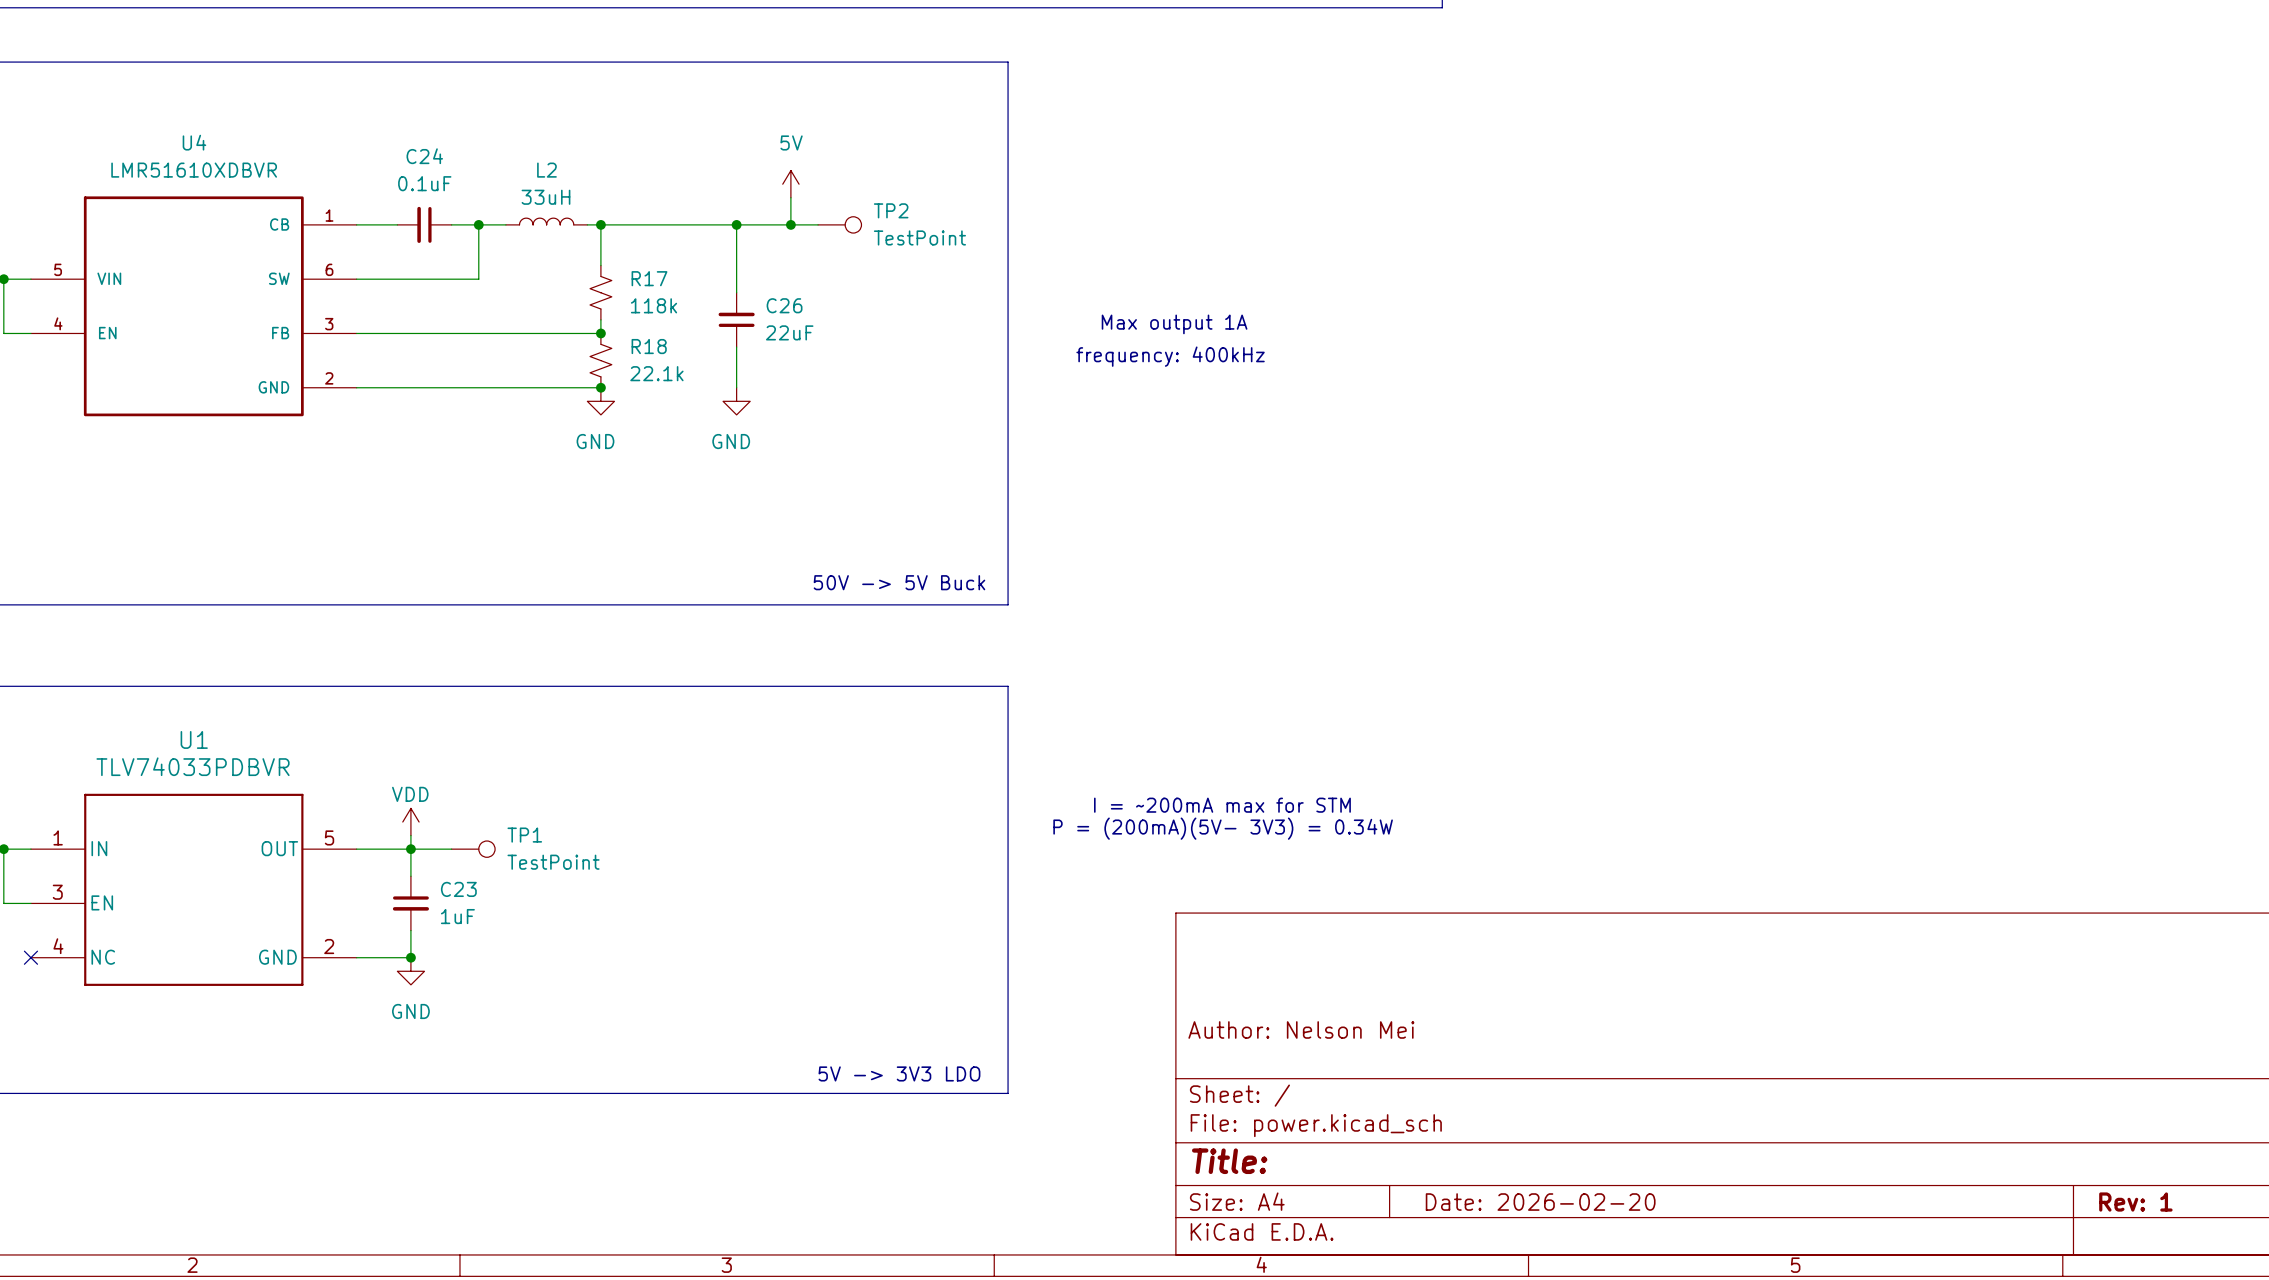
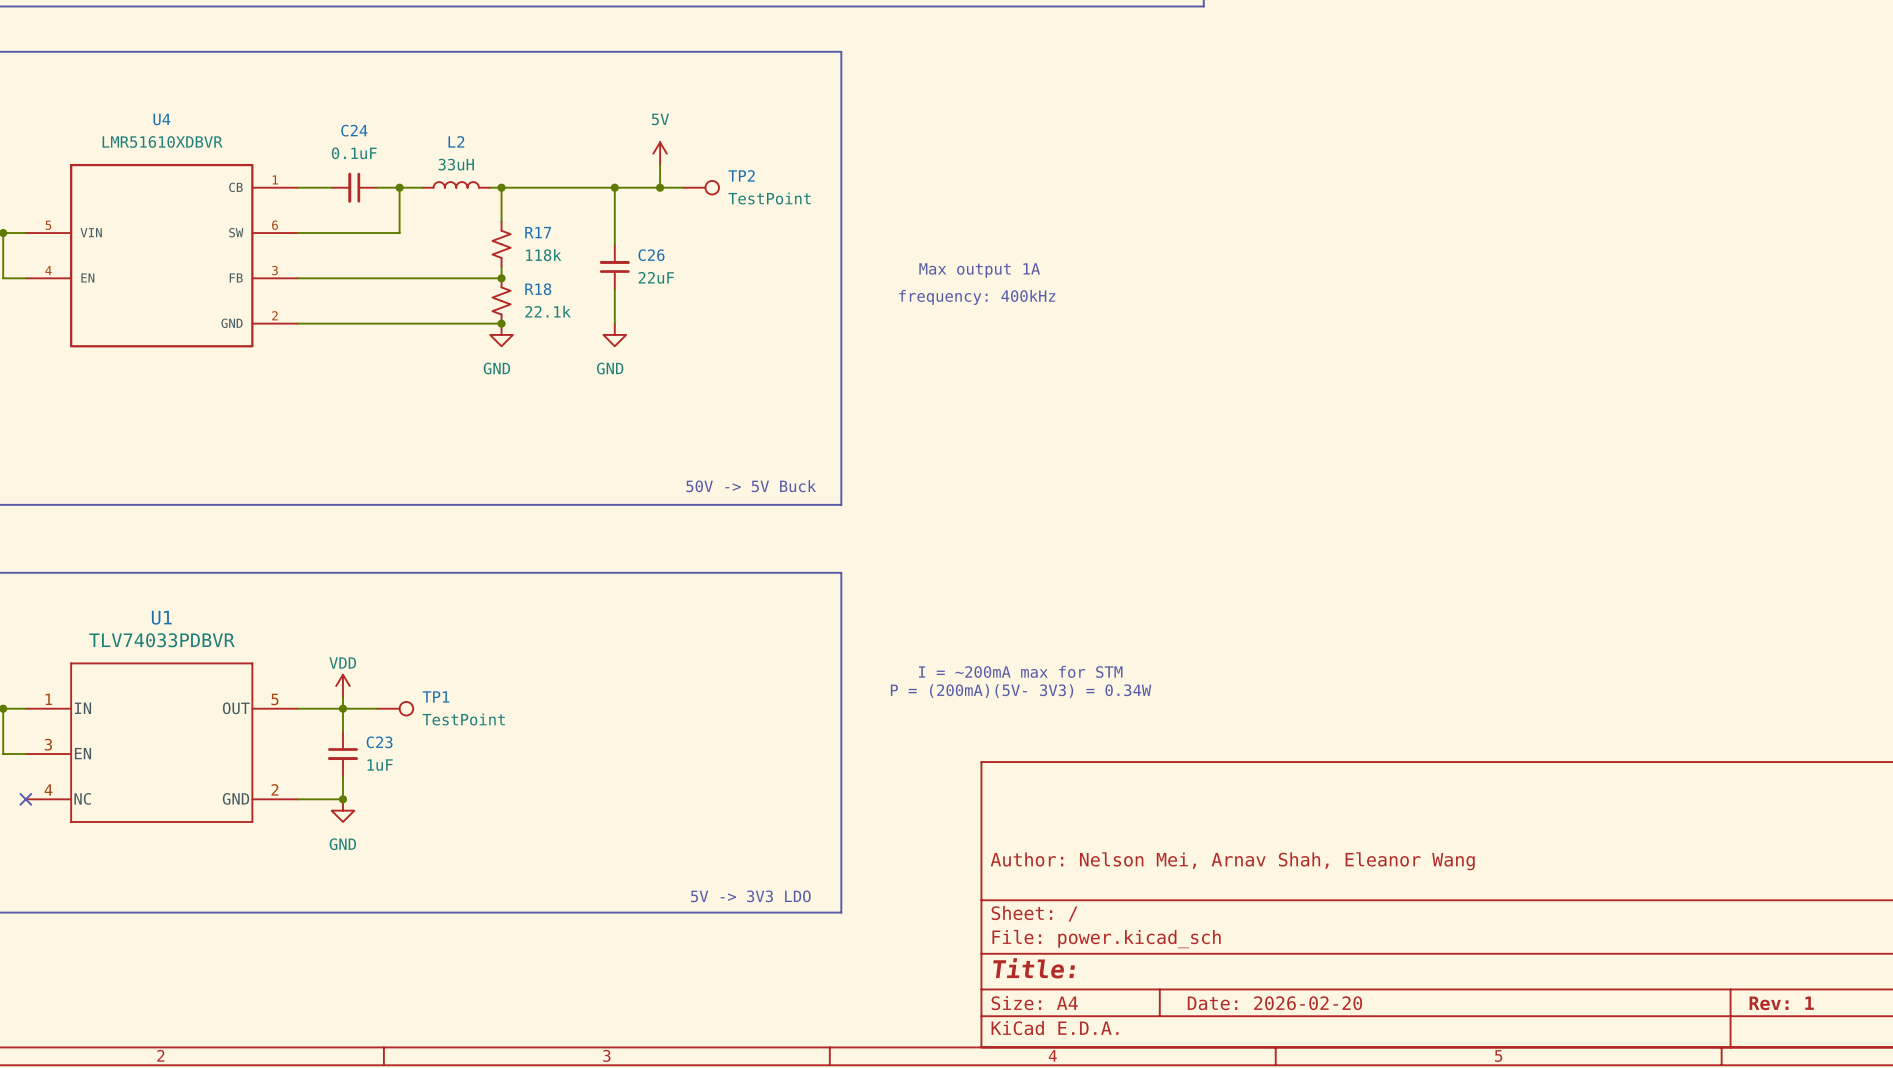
title block: Author: Nelson Mei (1301, 1029) -> Author: Nelson Mei, Arnav Shah, Eleanor Wang (1232, 861)

